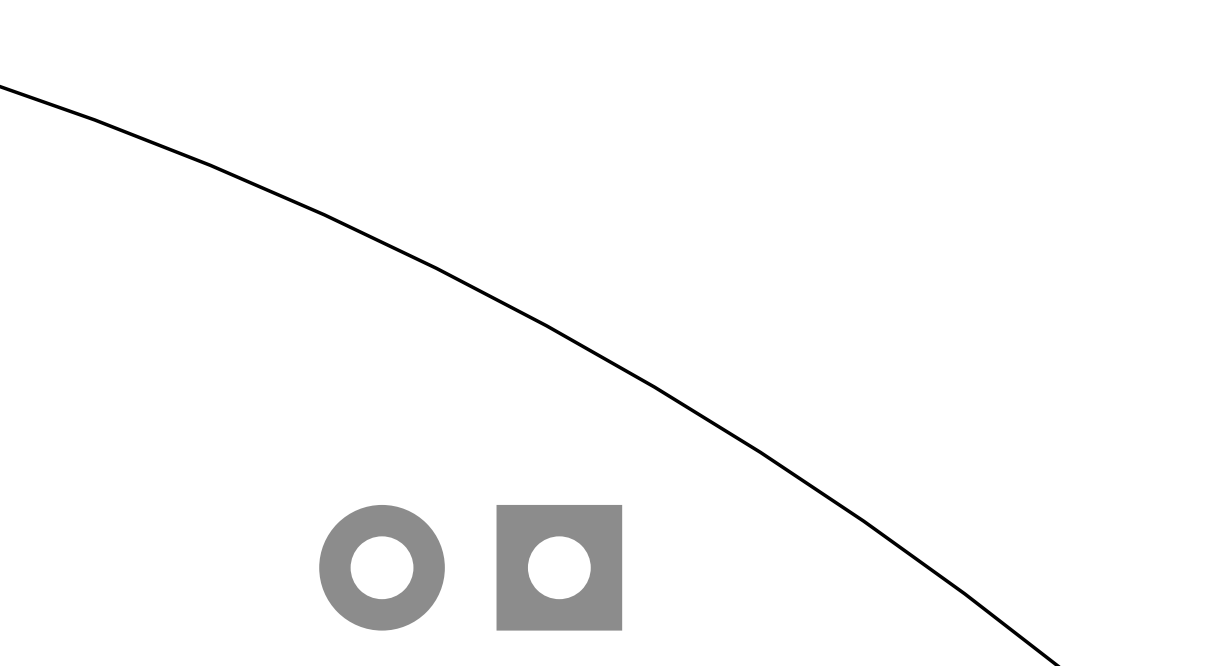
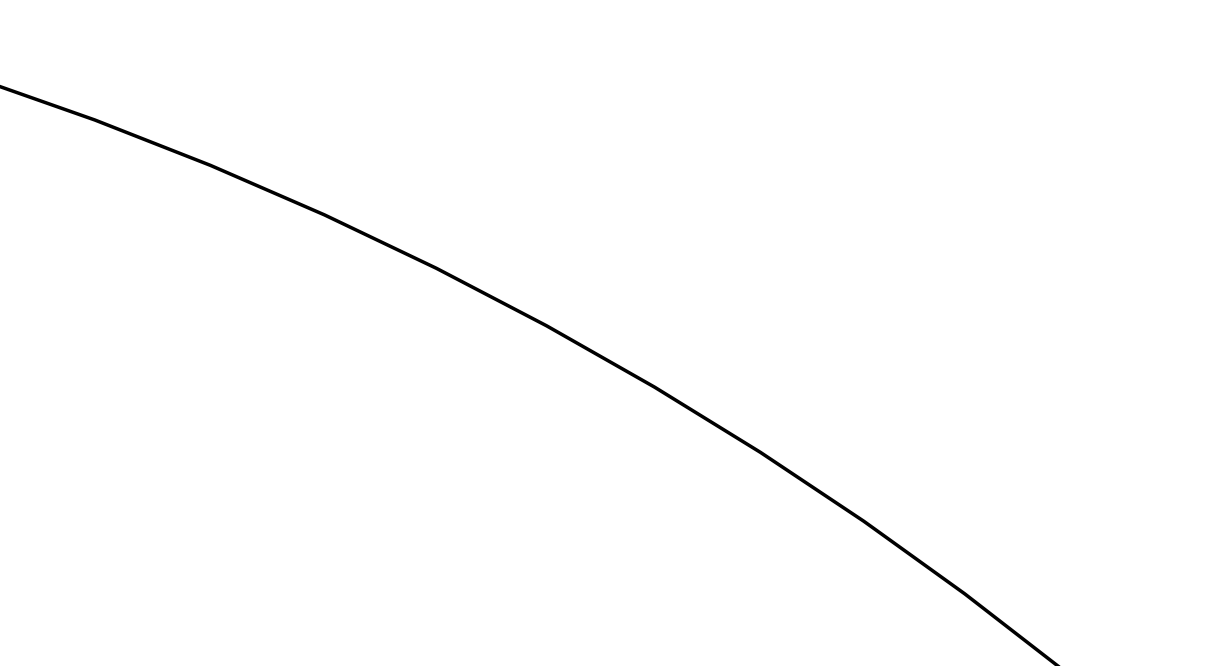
part: (470, 567) -> none

